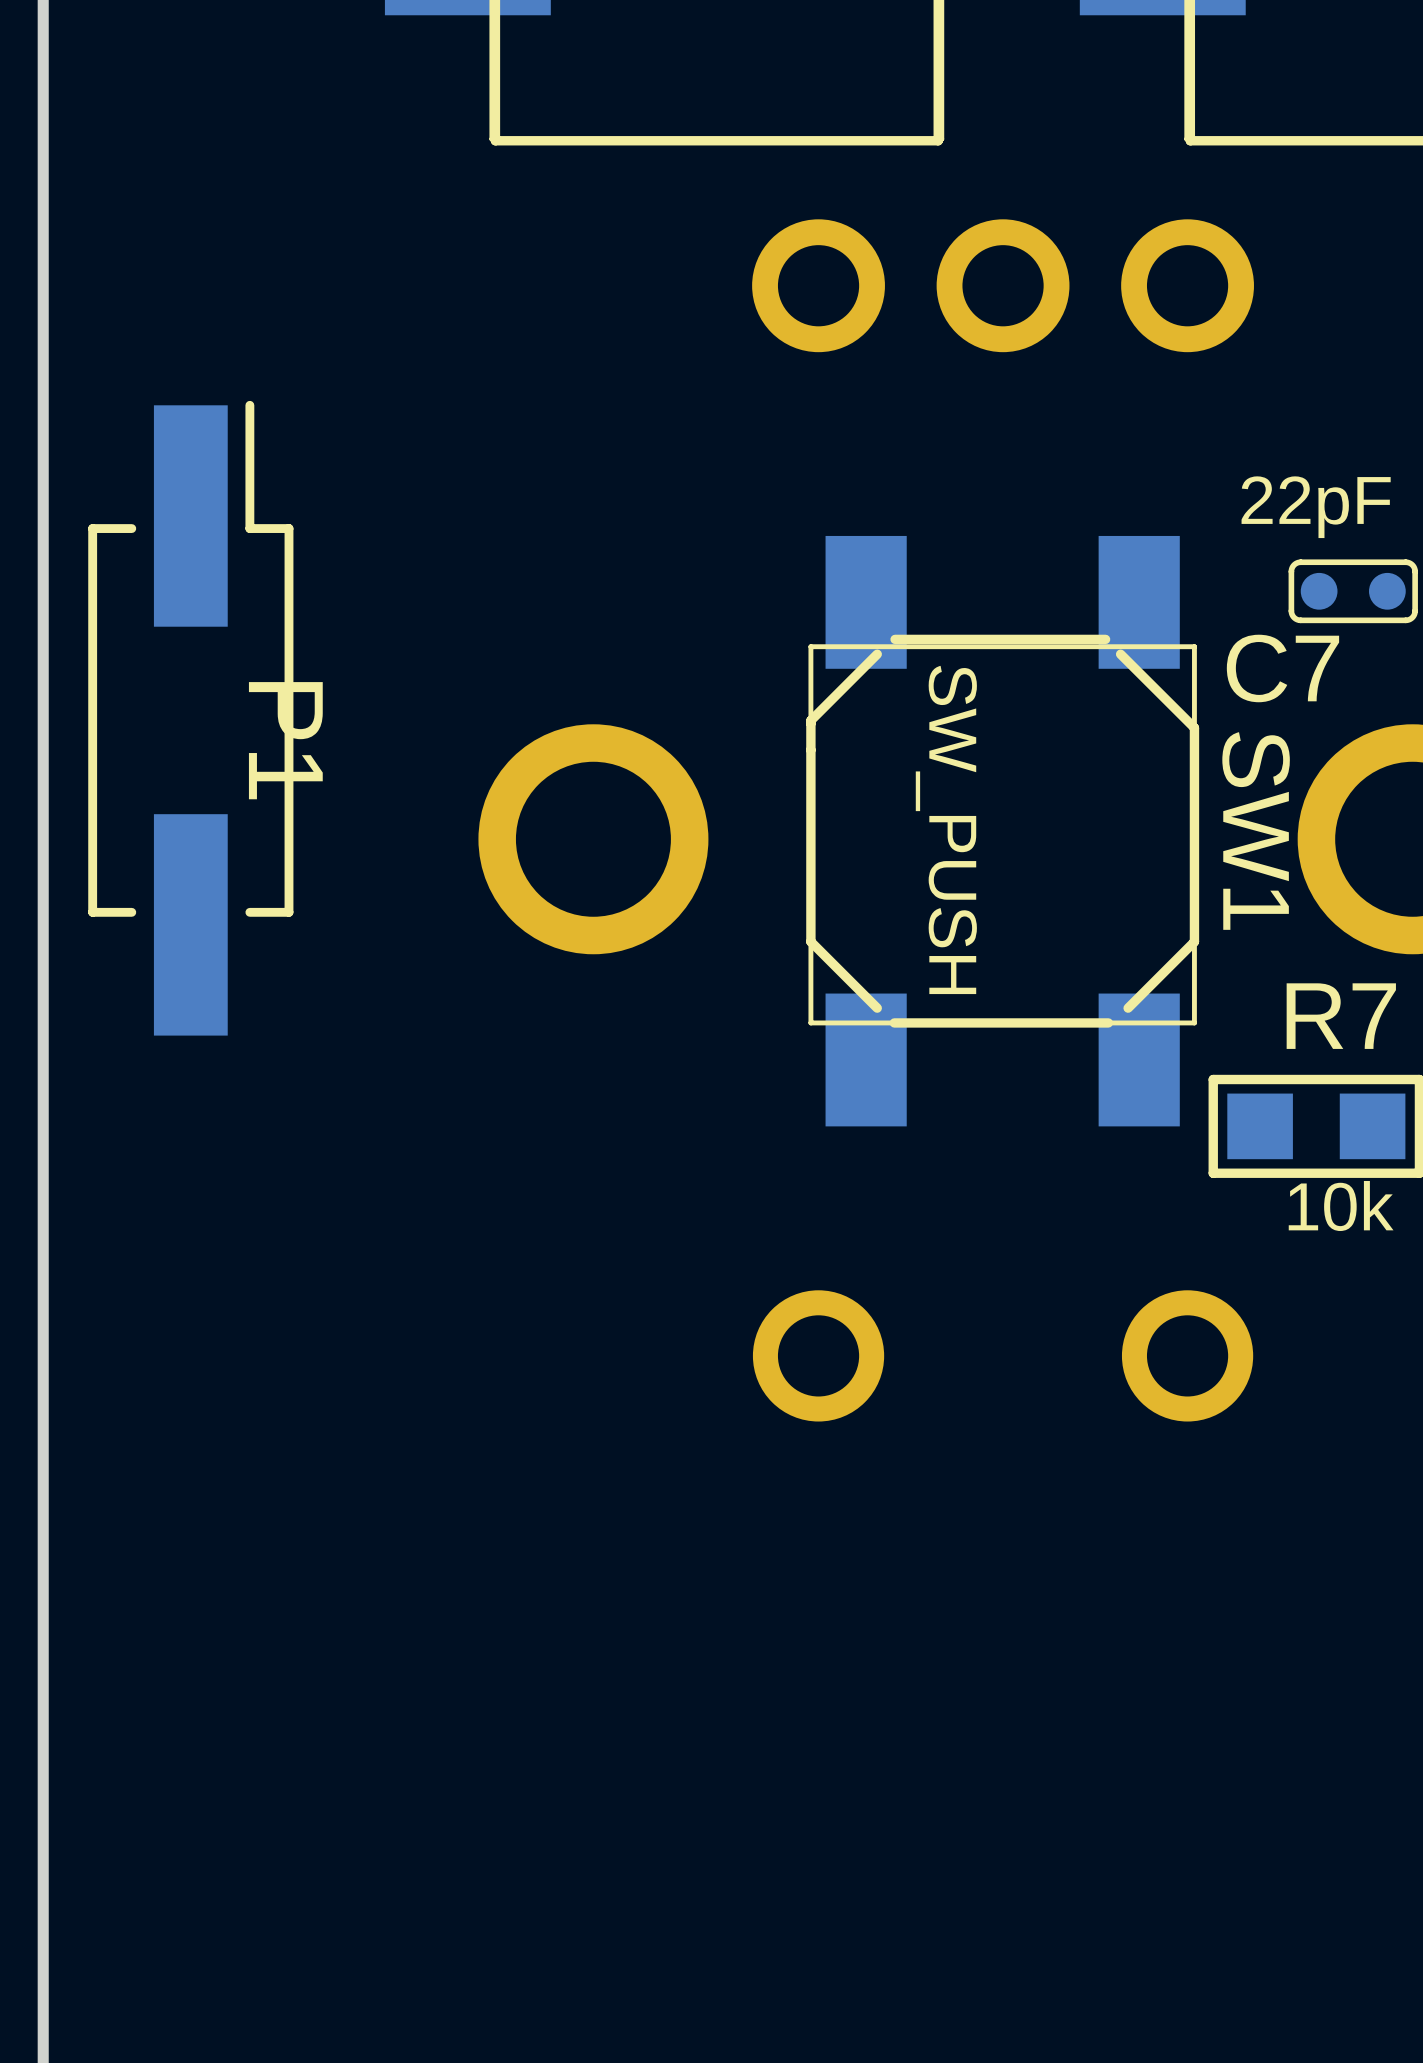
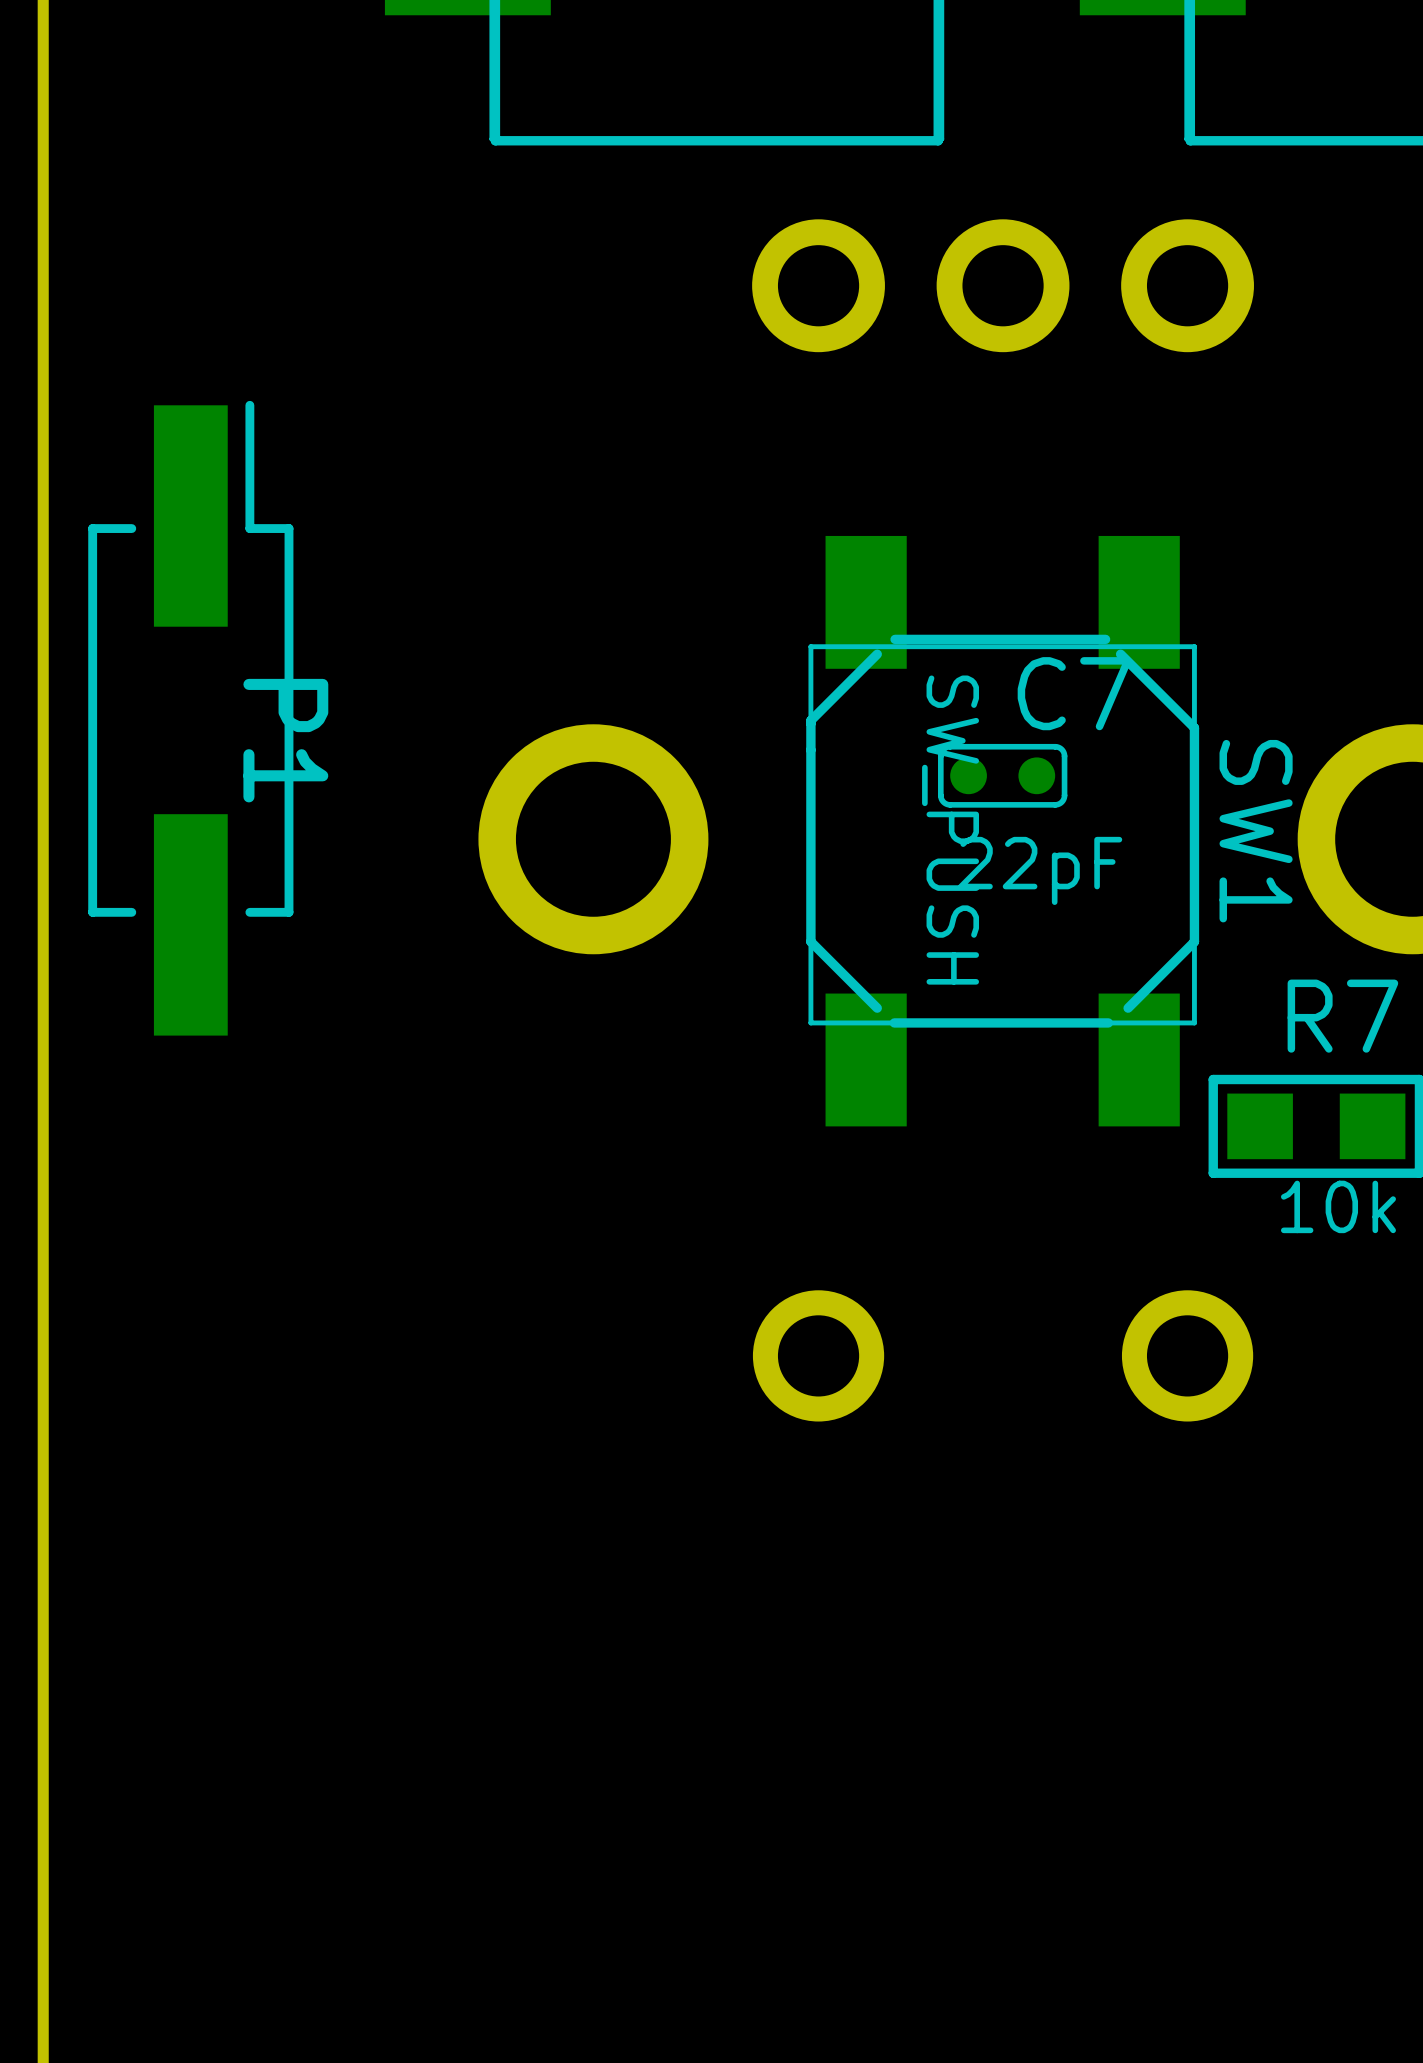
C7 value position: 22pF (1316, 507) -> 22pF (1040, 870)
C7 position: (1353, 591) -> (1002, 775)
C7 name position: C7 (1282, 668) -> C7 (1074, 693)

